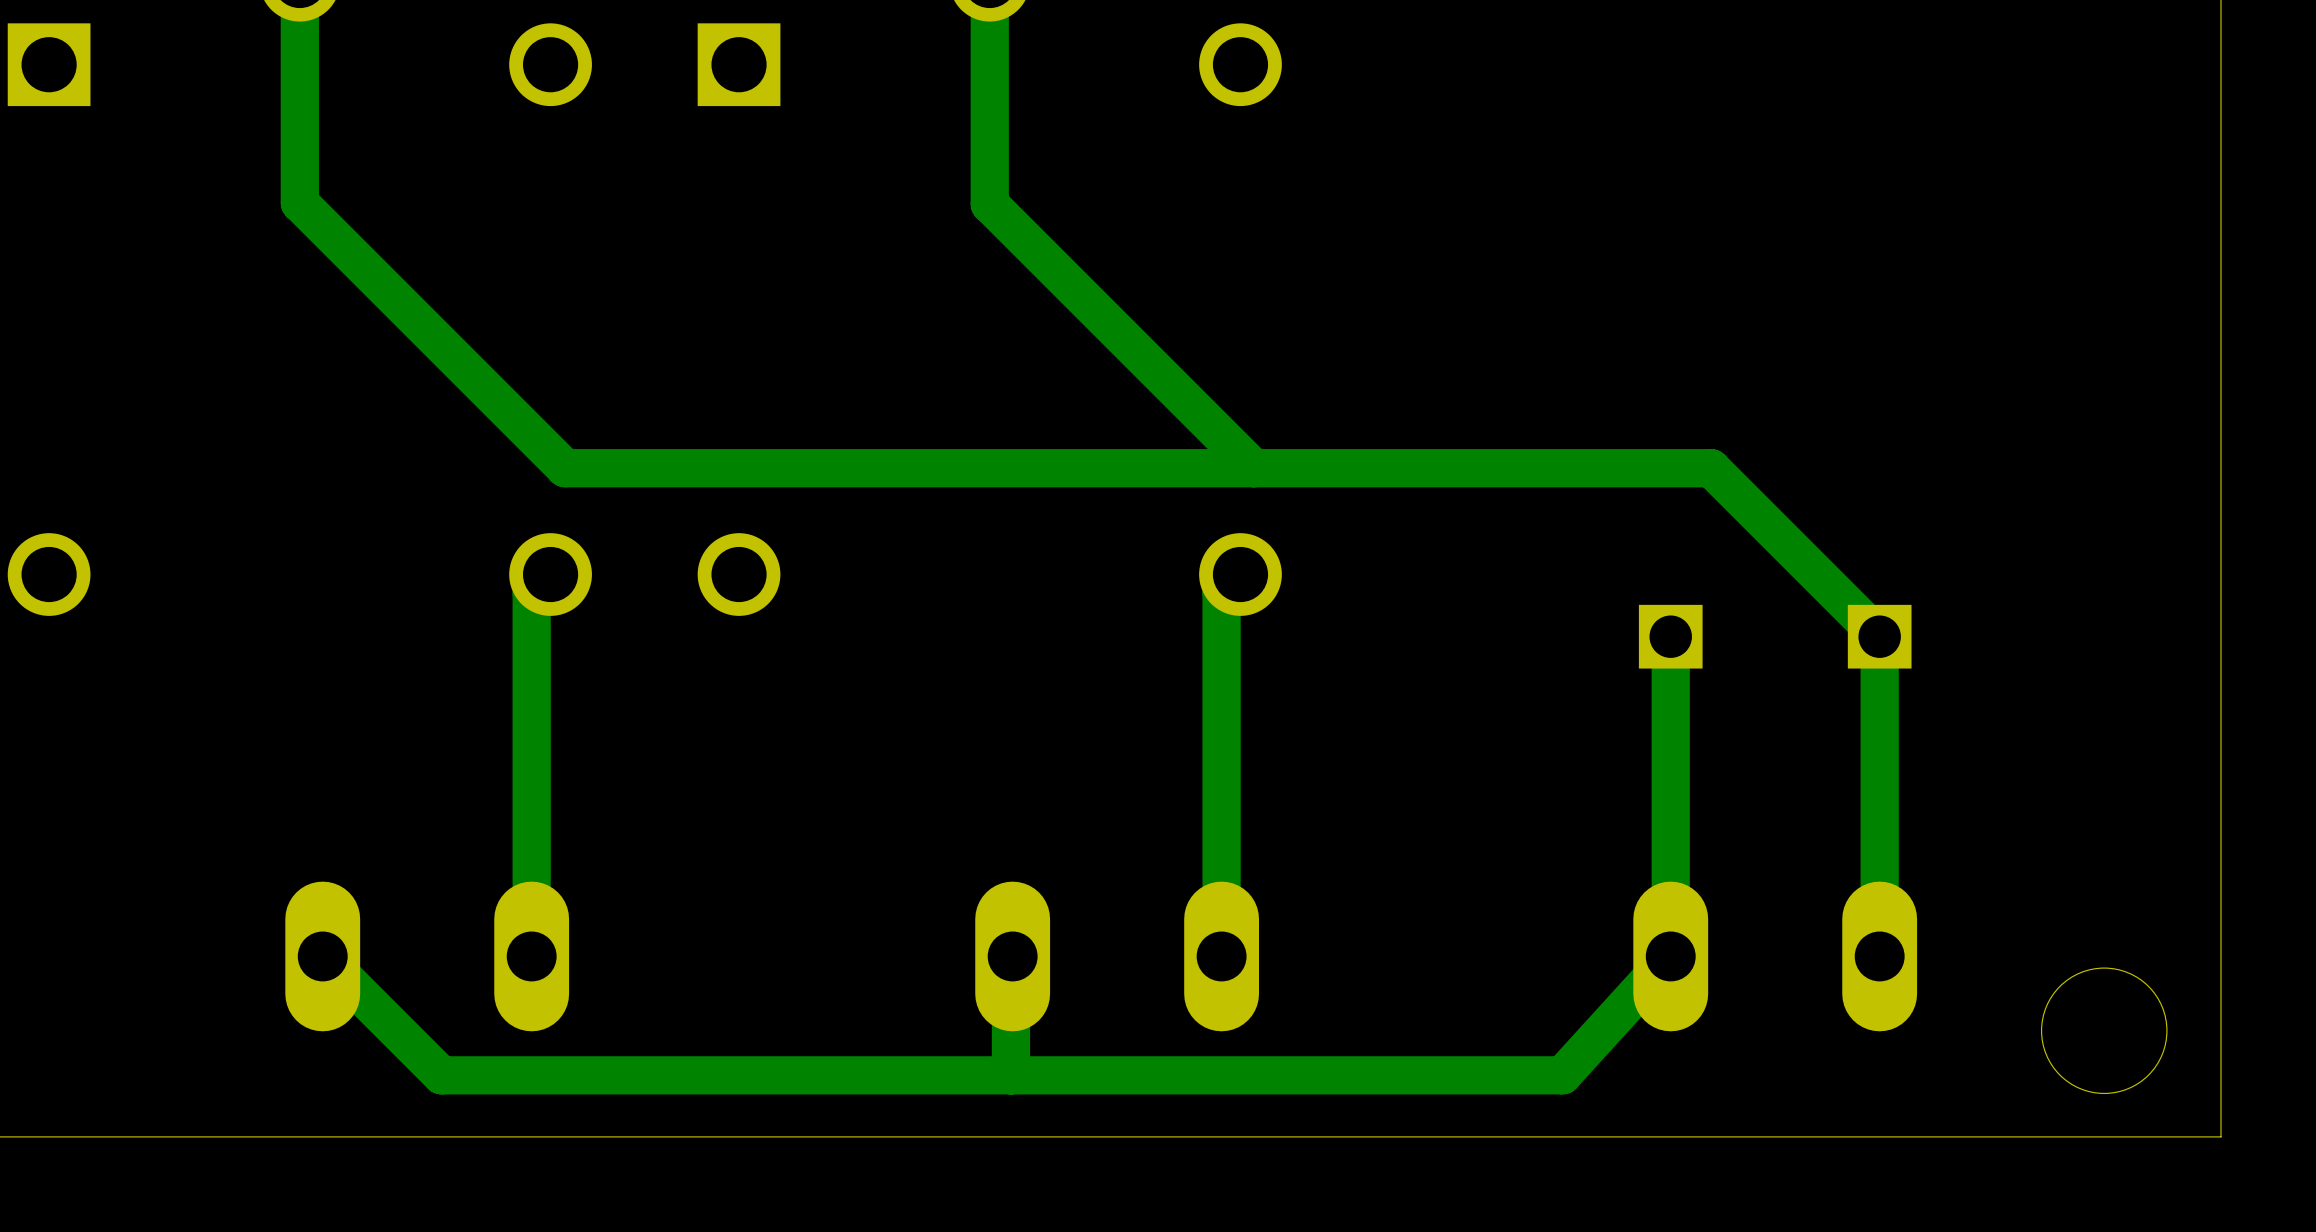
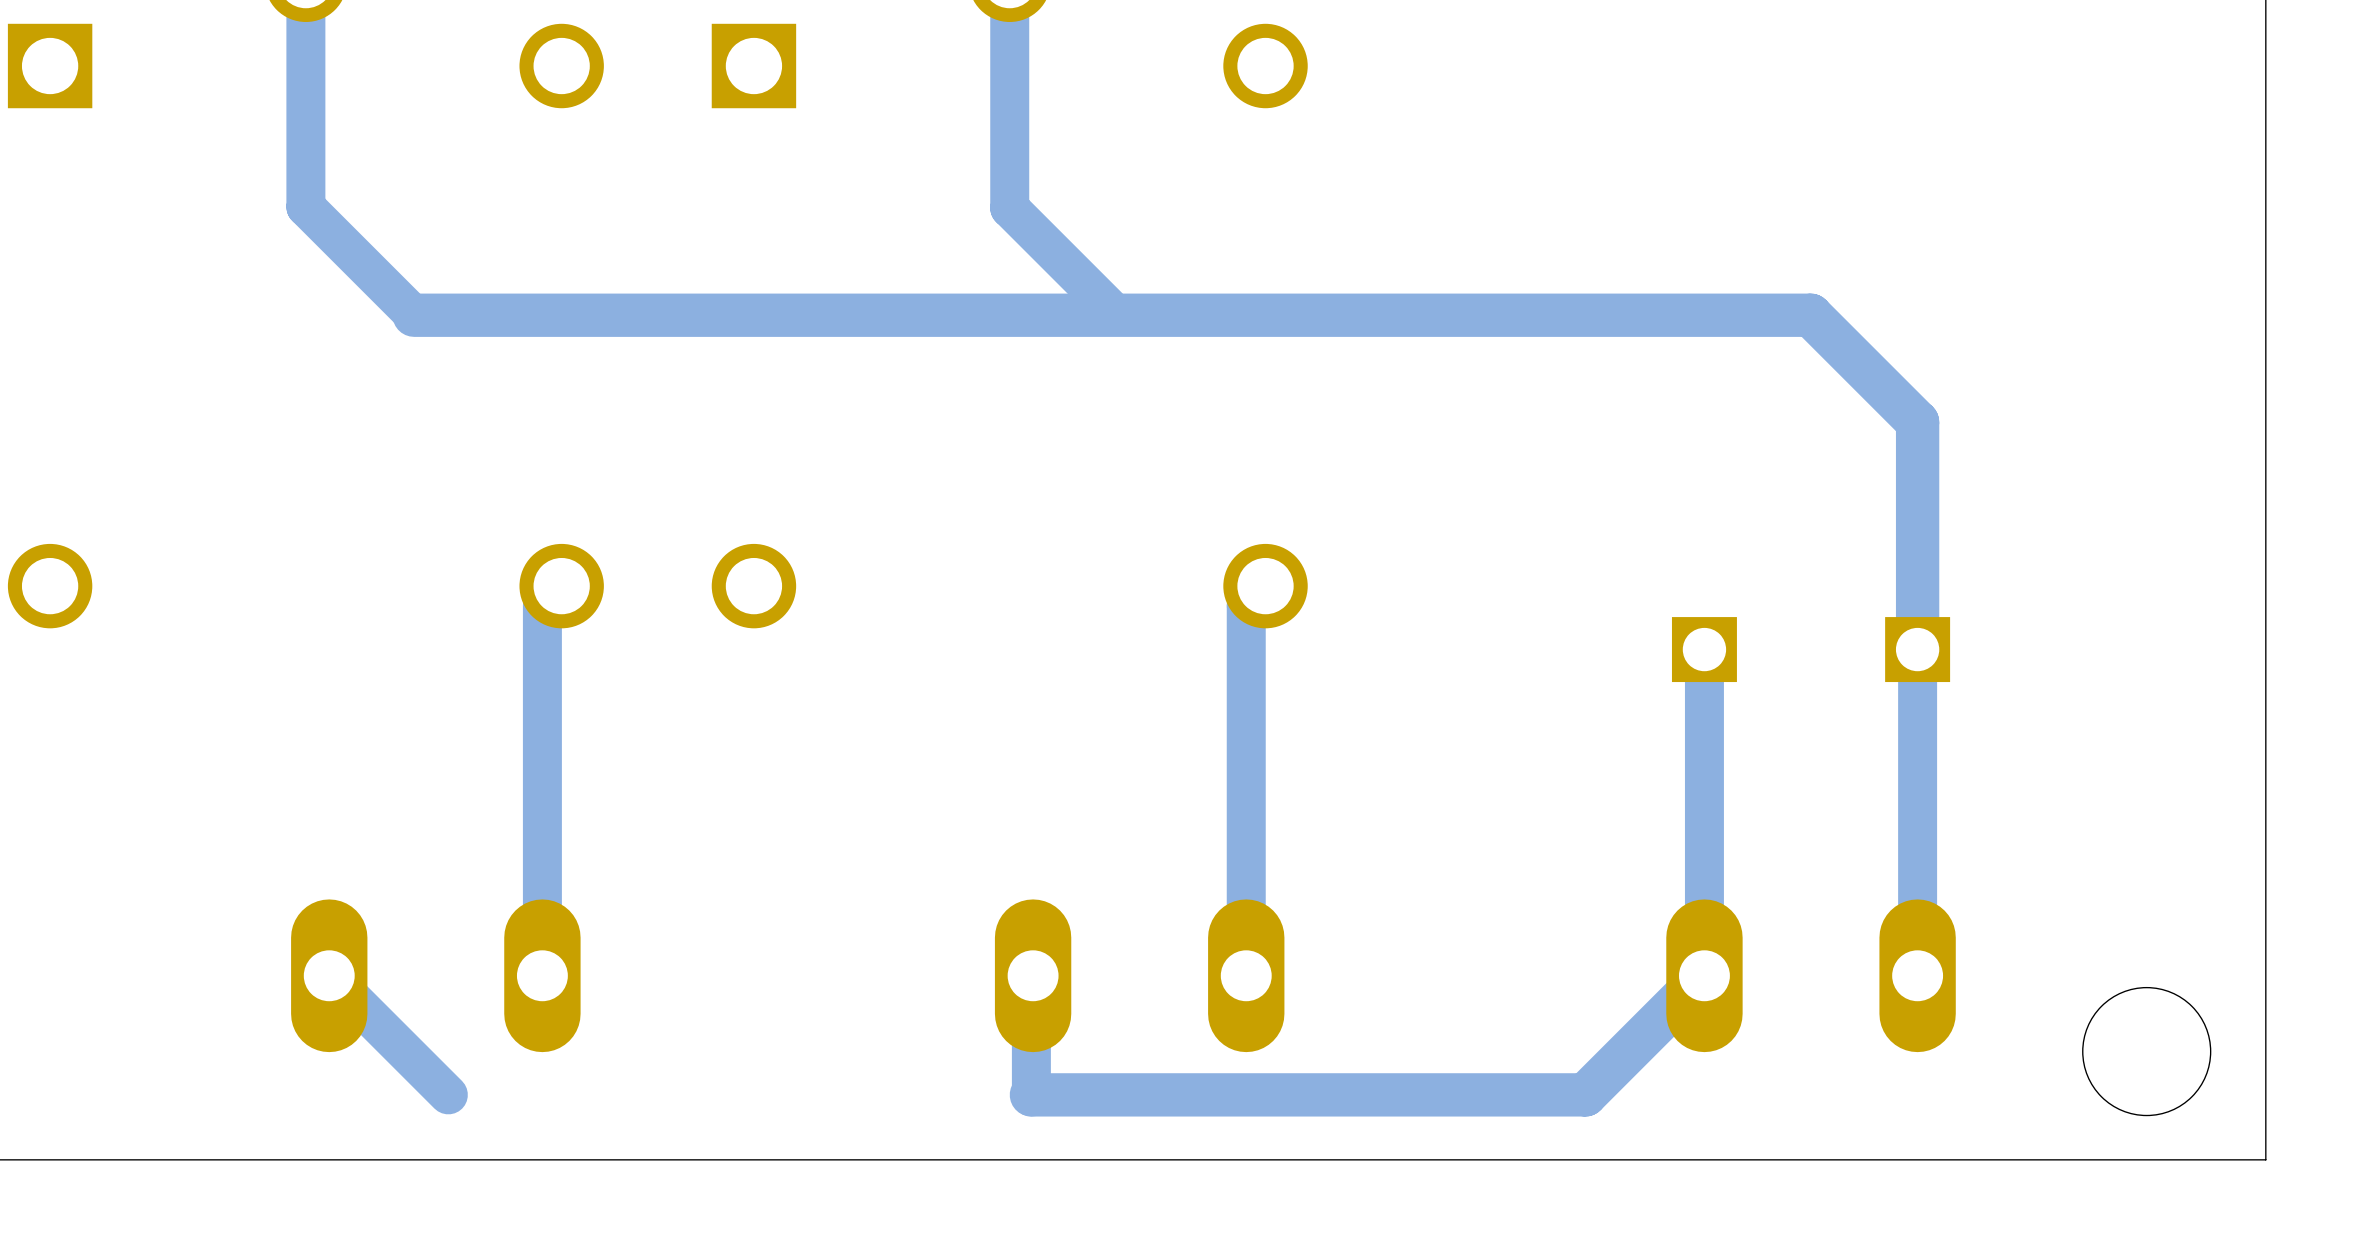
track: (405, 309) (565, 468) (1711, 468) (1879, 636) -> (414, 315) (1810, 315) (1917, 422) (1917, 649)
track: (1094, 309) (1253, 468) -> none
track: (1670, 956) (1562, 1075) (441, 1075) (439, 1073) -> (1704, 975) (1585, 1094) (1031, 1094)

